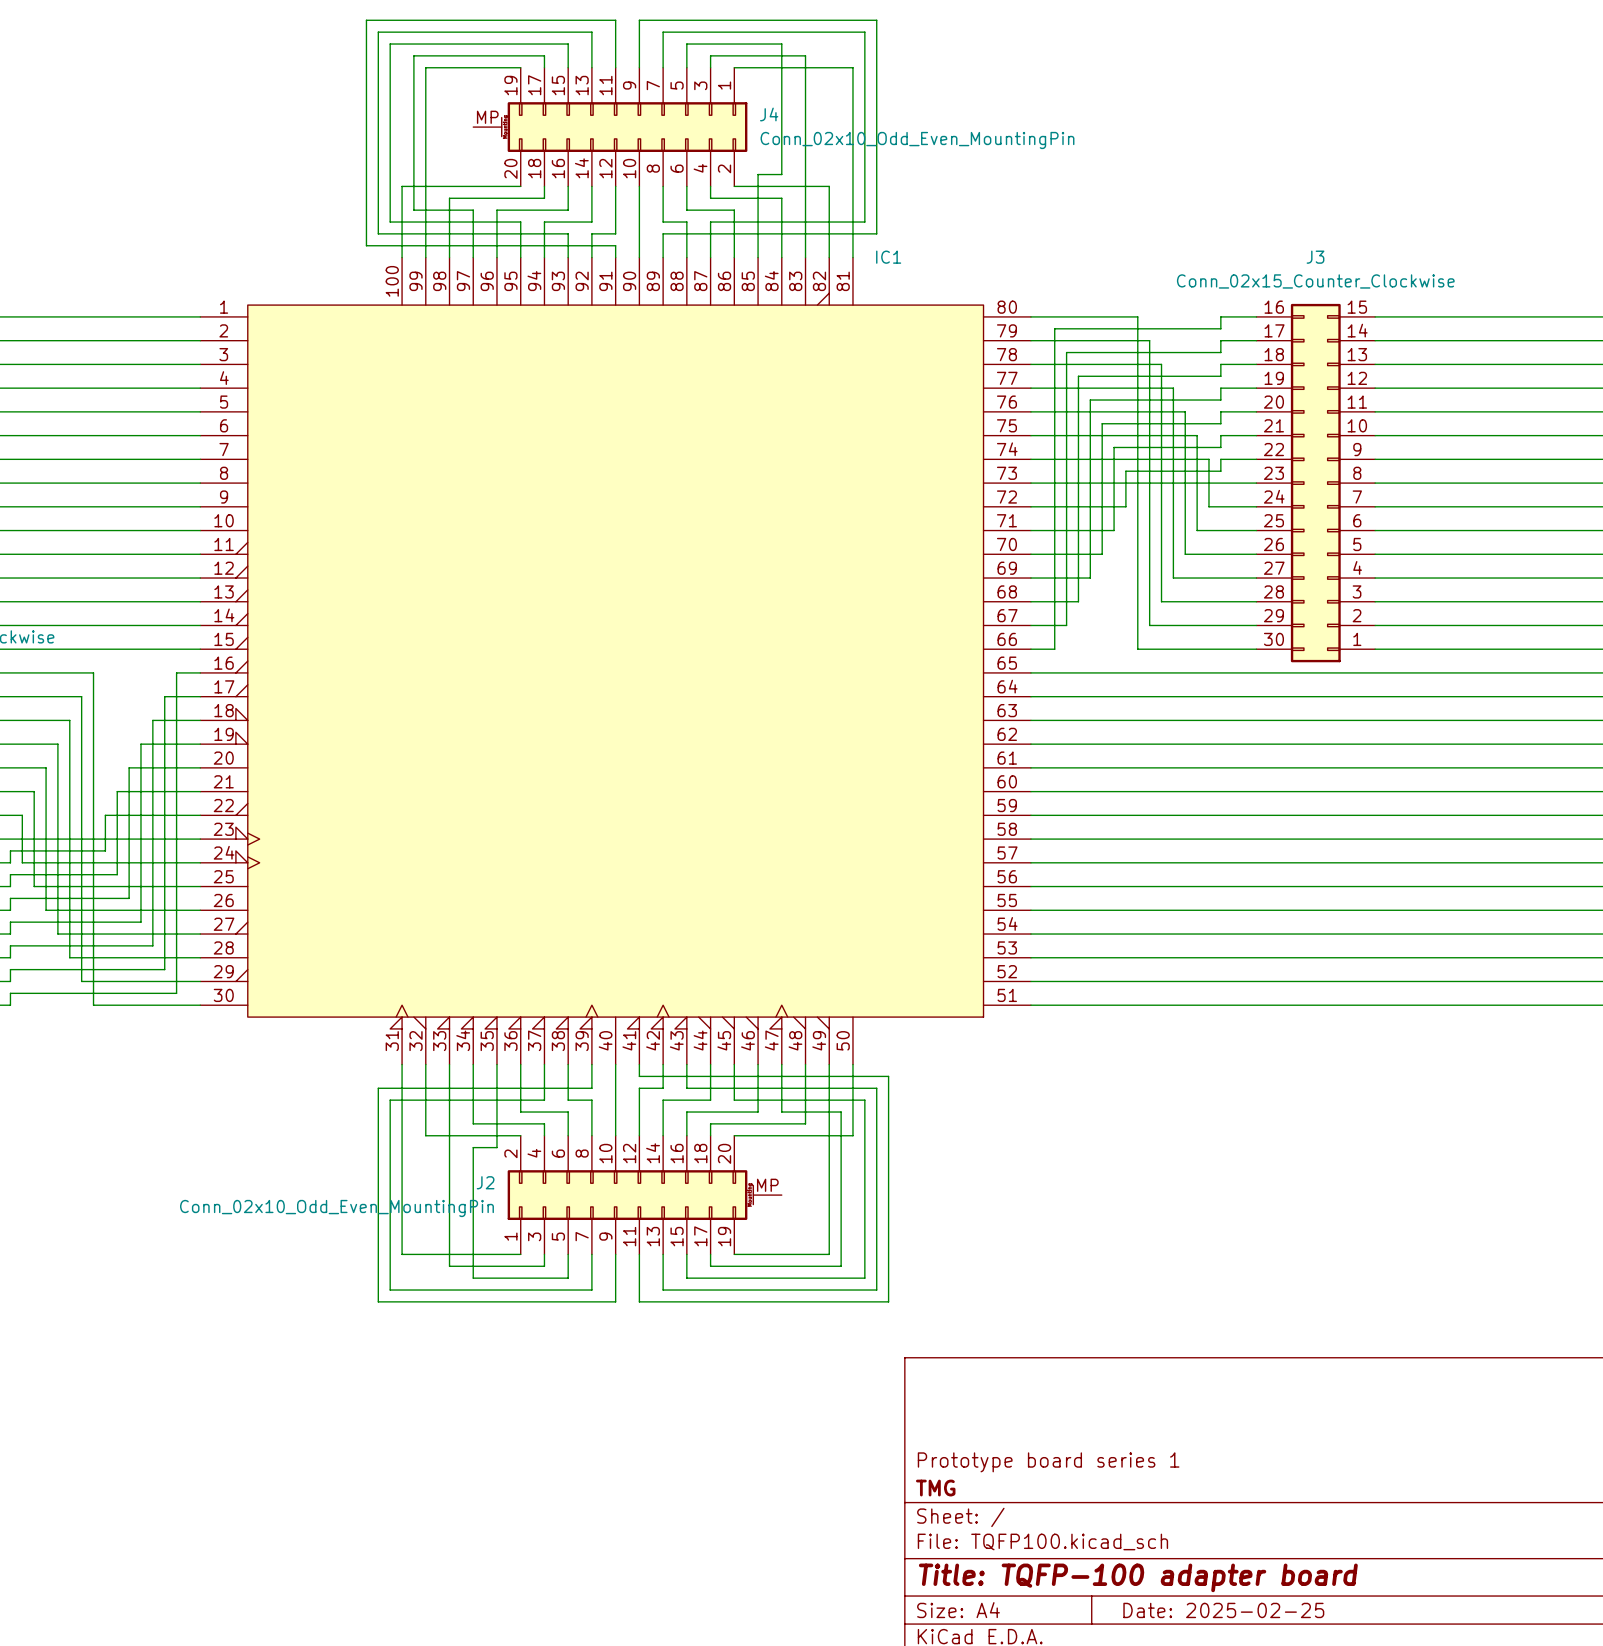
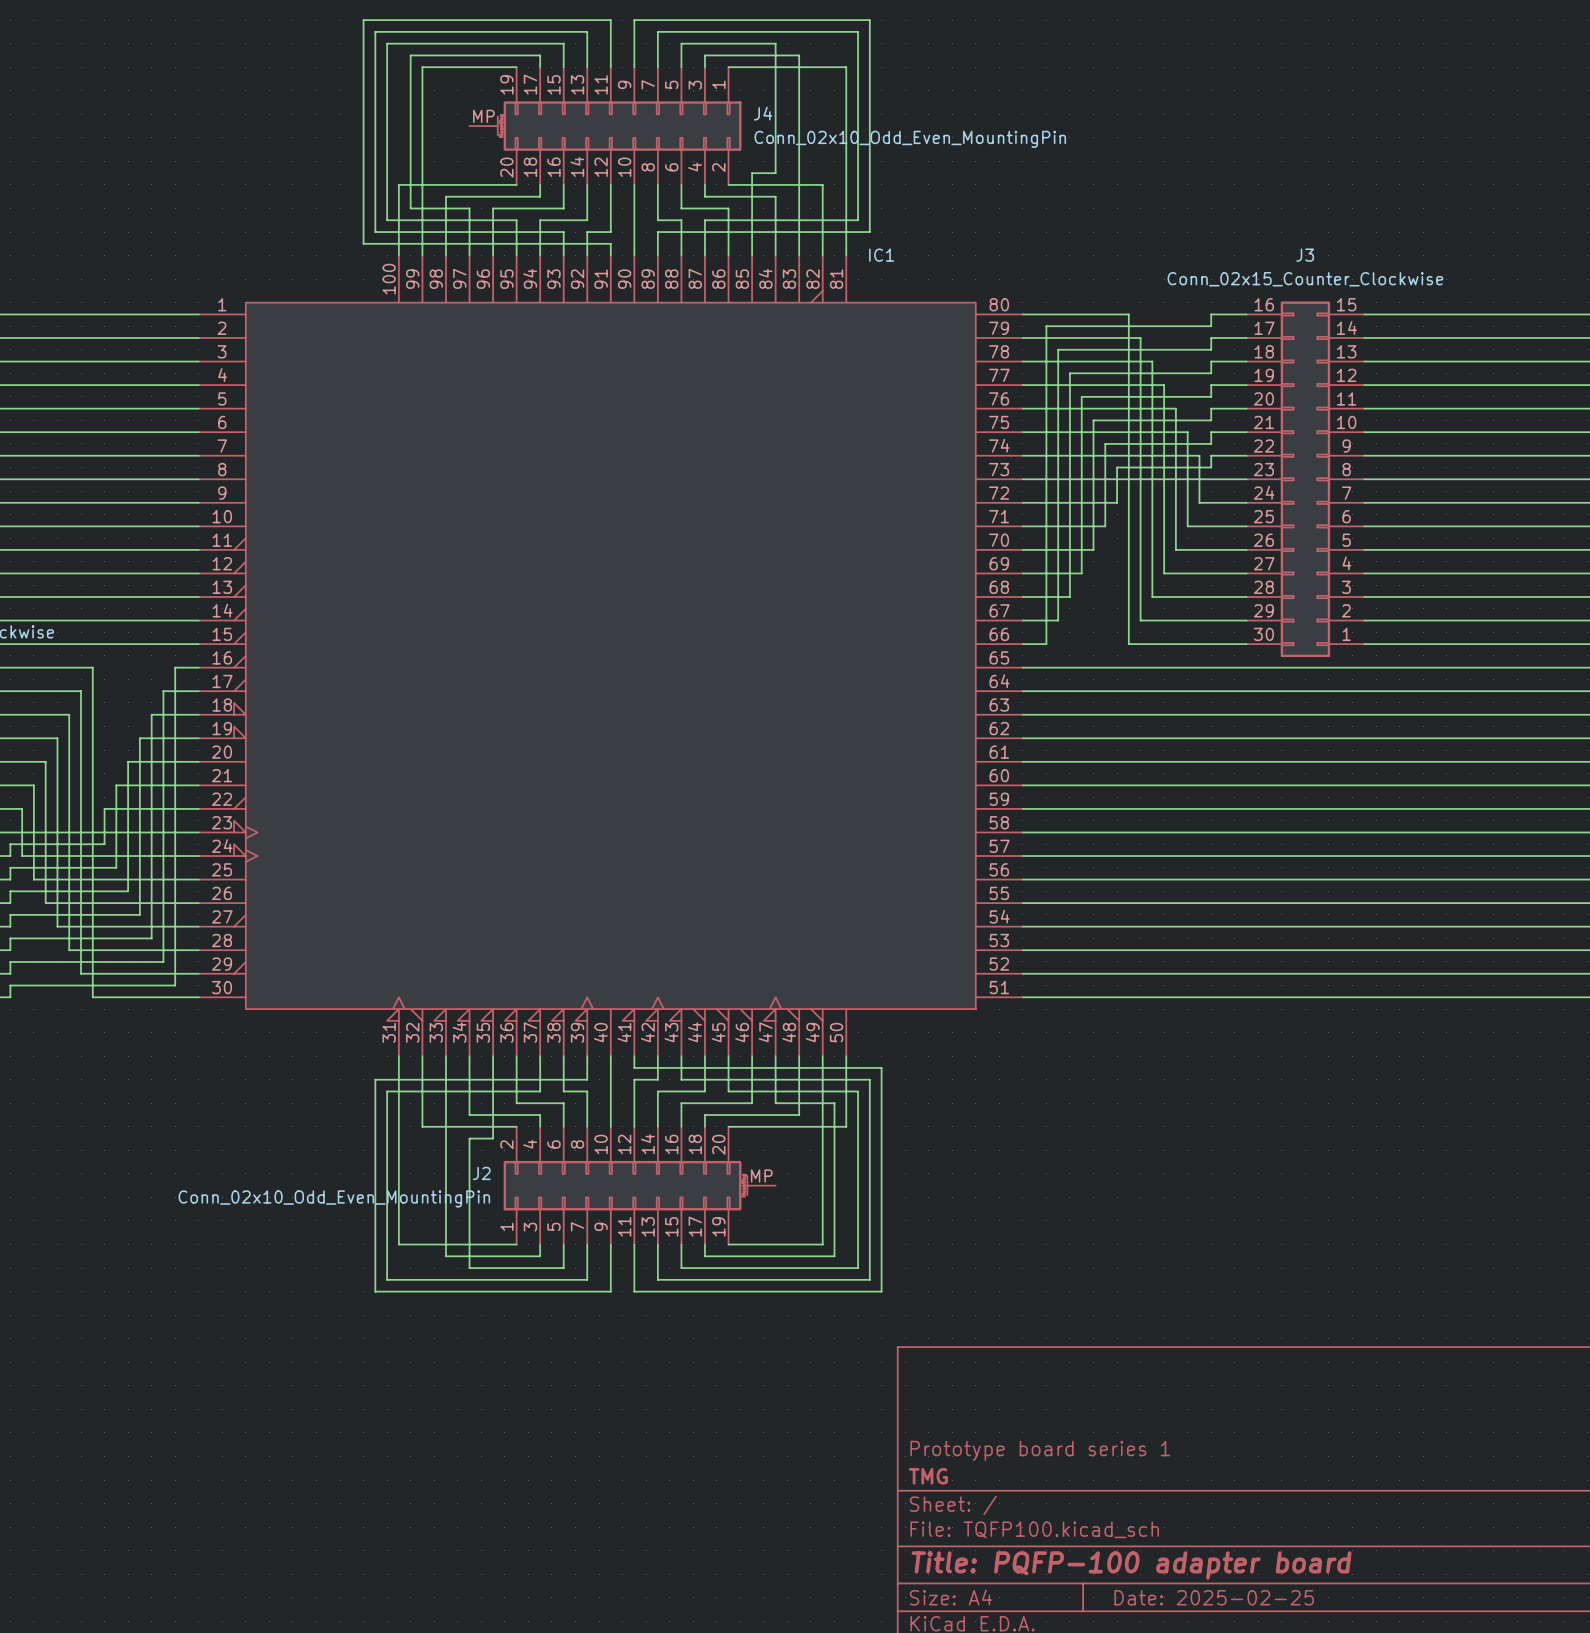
title block: Title: TQFP-100 adapter board (1138, 1577) -> Title: PQFP-100 adapter board (1131, 1565)

